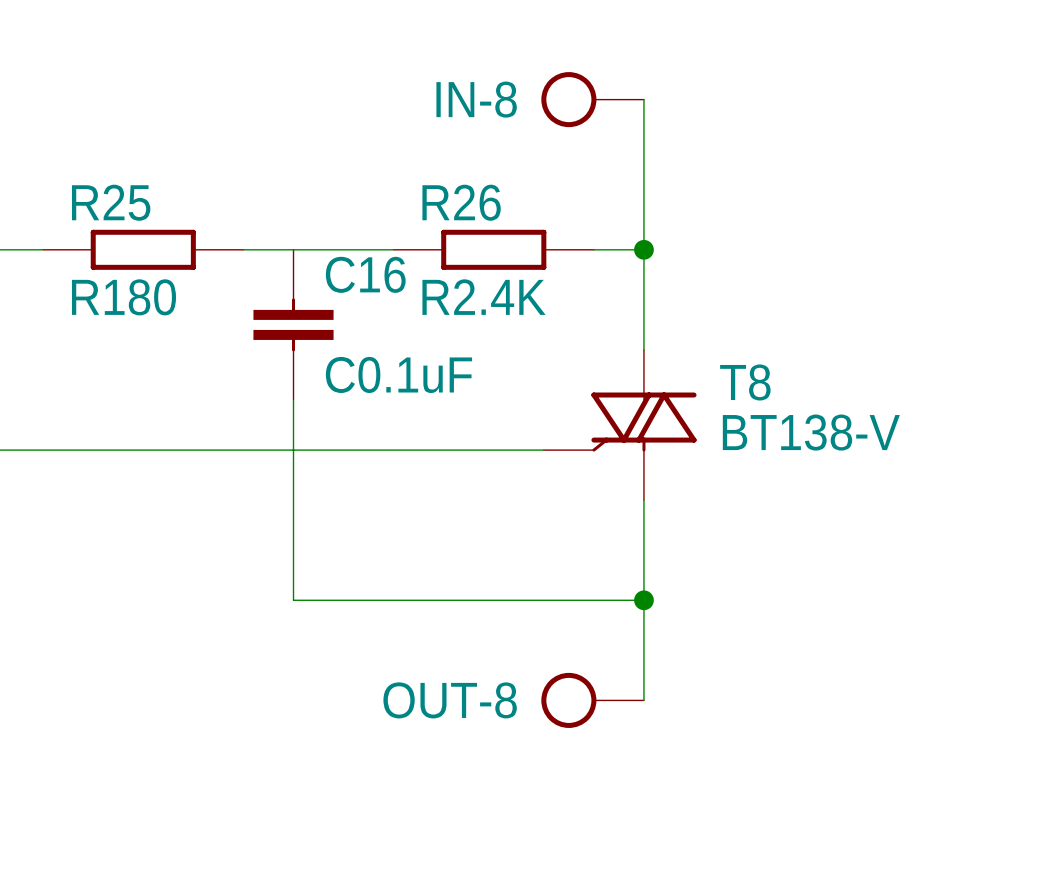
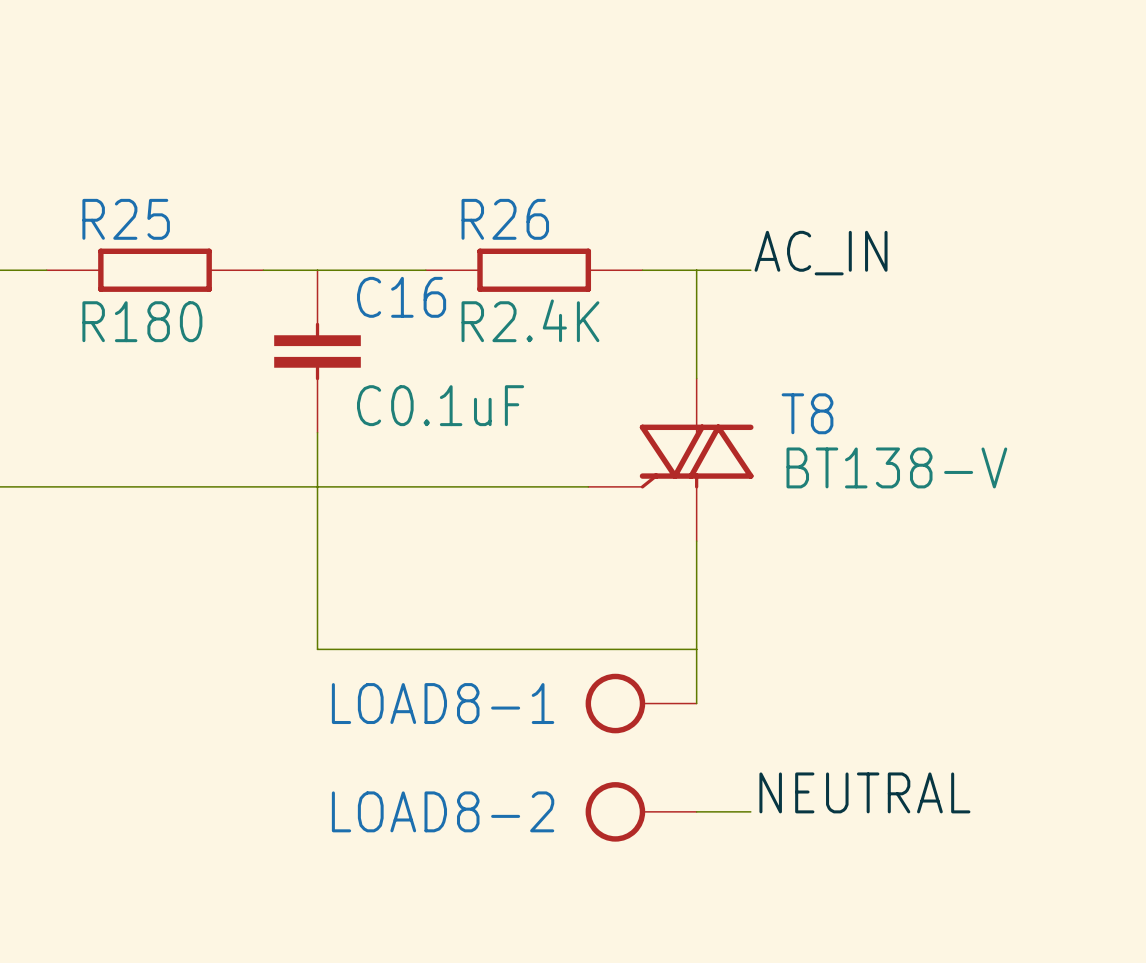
IN-8: (592, 99) -> none
wire: (643, 99) (643, 249) -> (750, 270) (696, 270)
label: none -> AC_IN (821, 253)
junction: (643, 249) -> none
junction: (643, 600) -> none
LOAD8-1: none -> (641, 703)
wire: (643, 650) (643, 700) -> none
OUT-8: (592, 700) -> none
label: none -> NEUTRAL (864, 792)
LOAD8-2: none -> (641, 811)
wire: none -> (696, 811) (750, 811)

